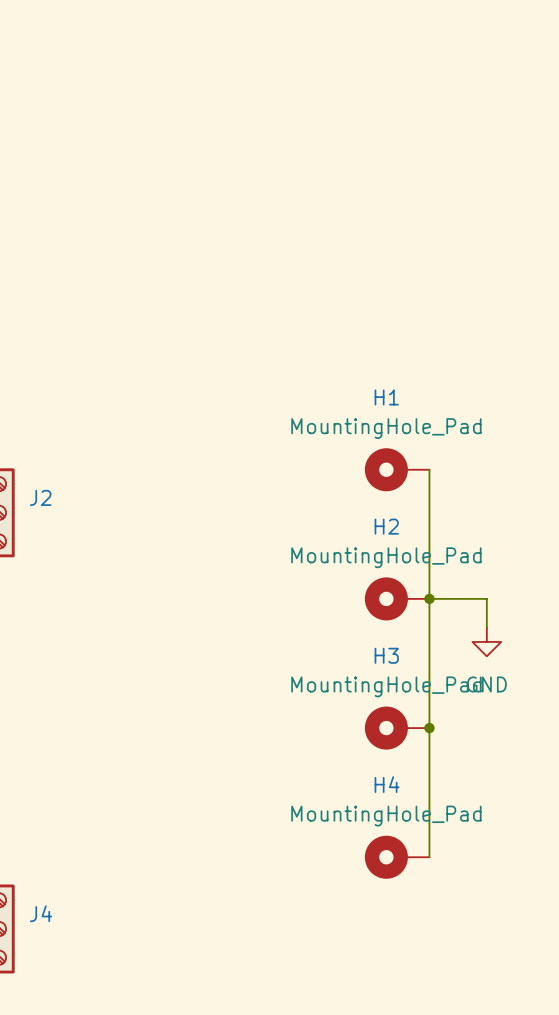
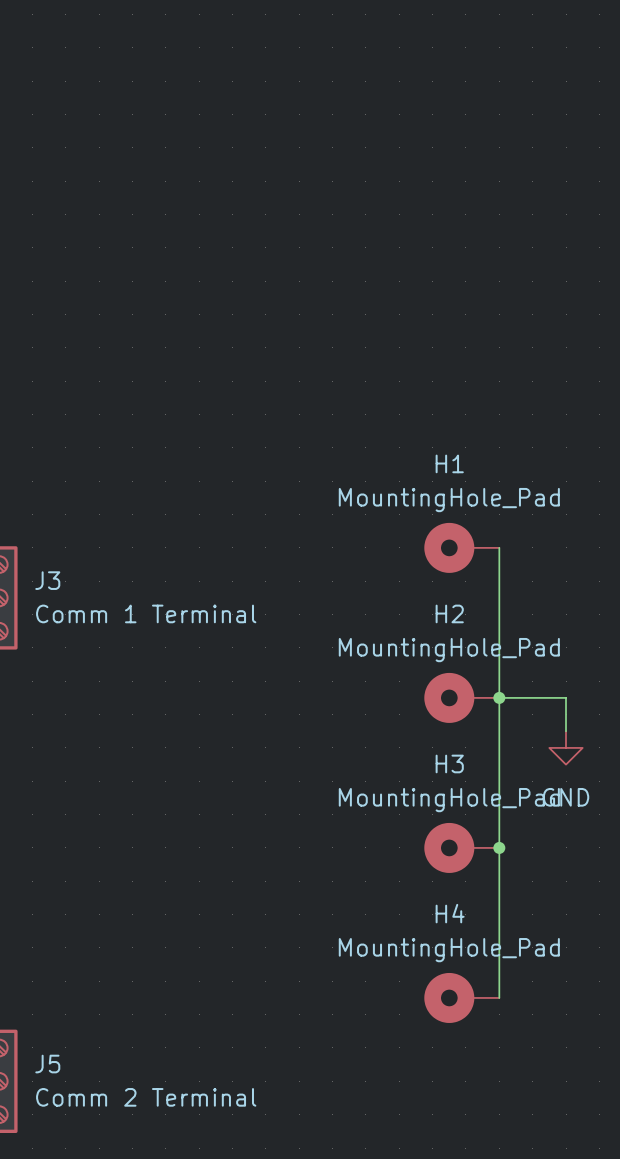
J2 name: J2 (40, 497) -> J3 (47, 580)
J2 value: none -> Comm 1 Terminal (146, 613)
J4 name: J4 (41, 913) -> J5 (47, 1064)
J4 value: none -> Comm 2 Terminal (146, 1097)

